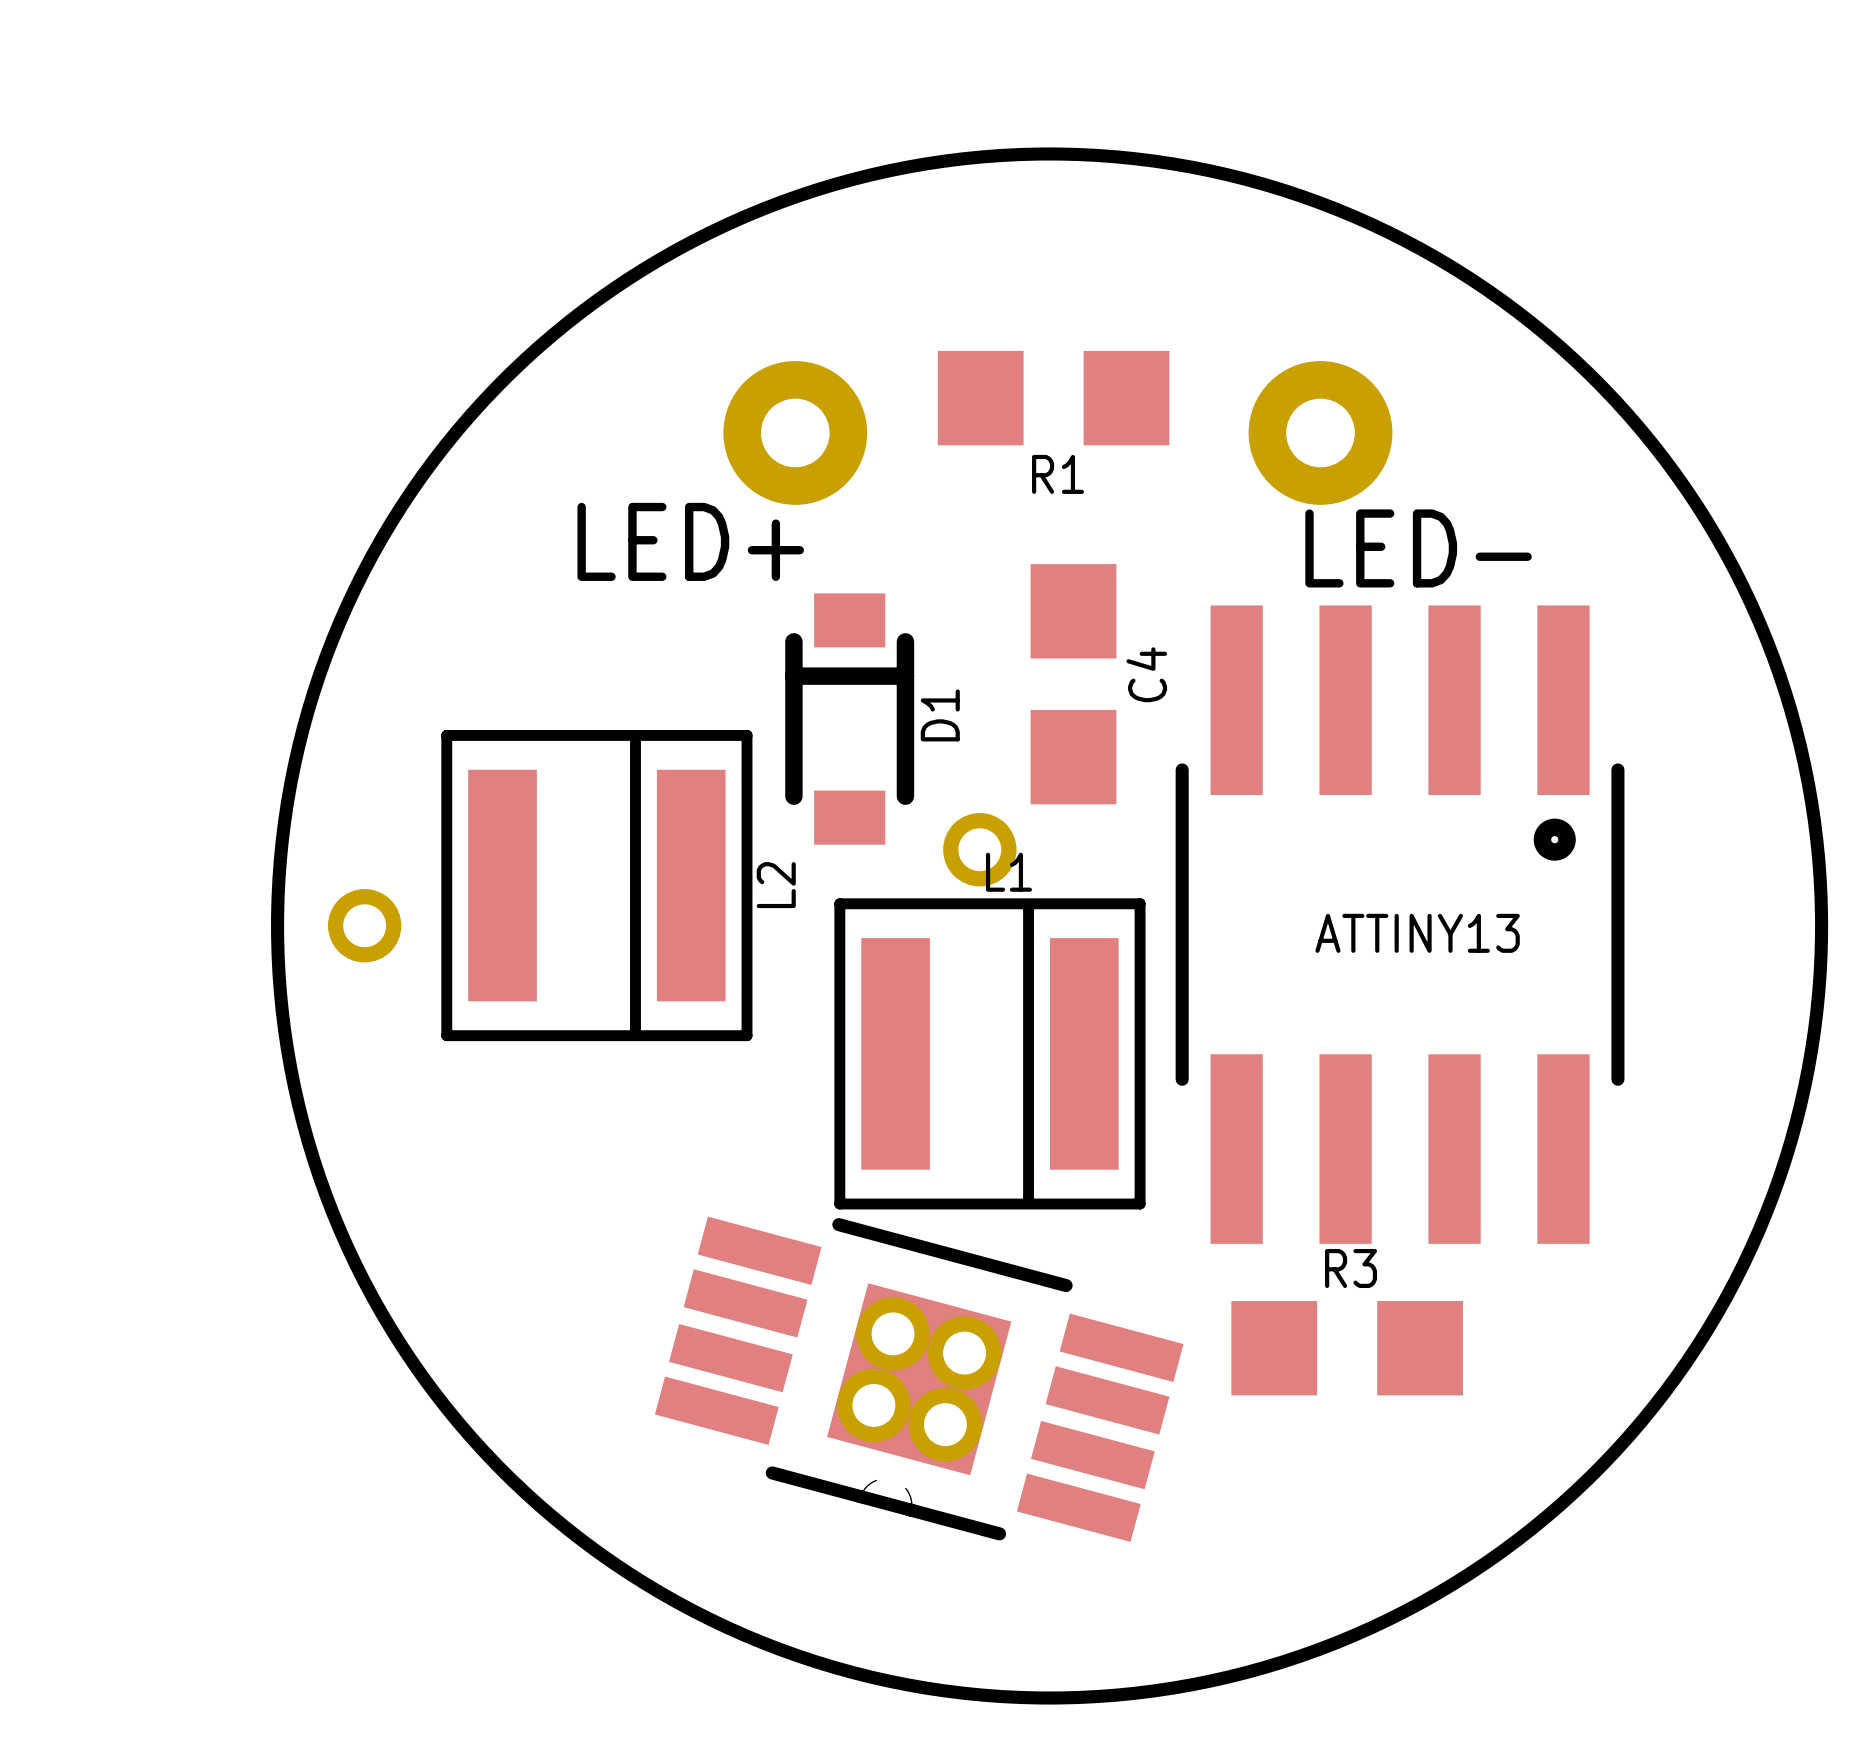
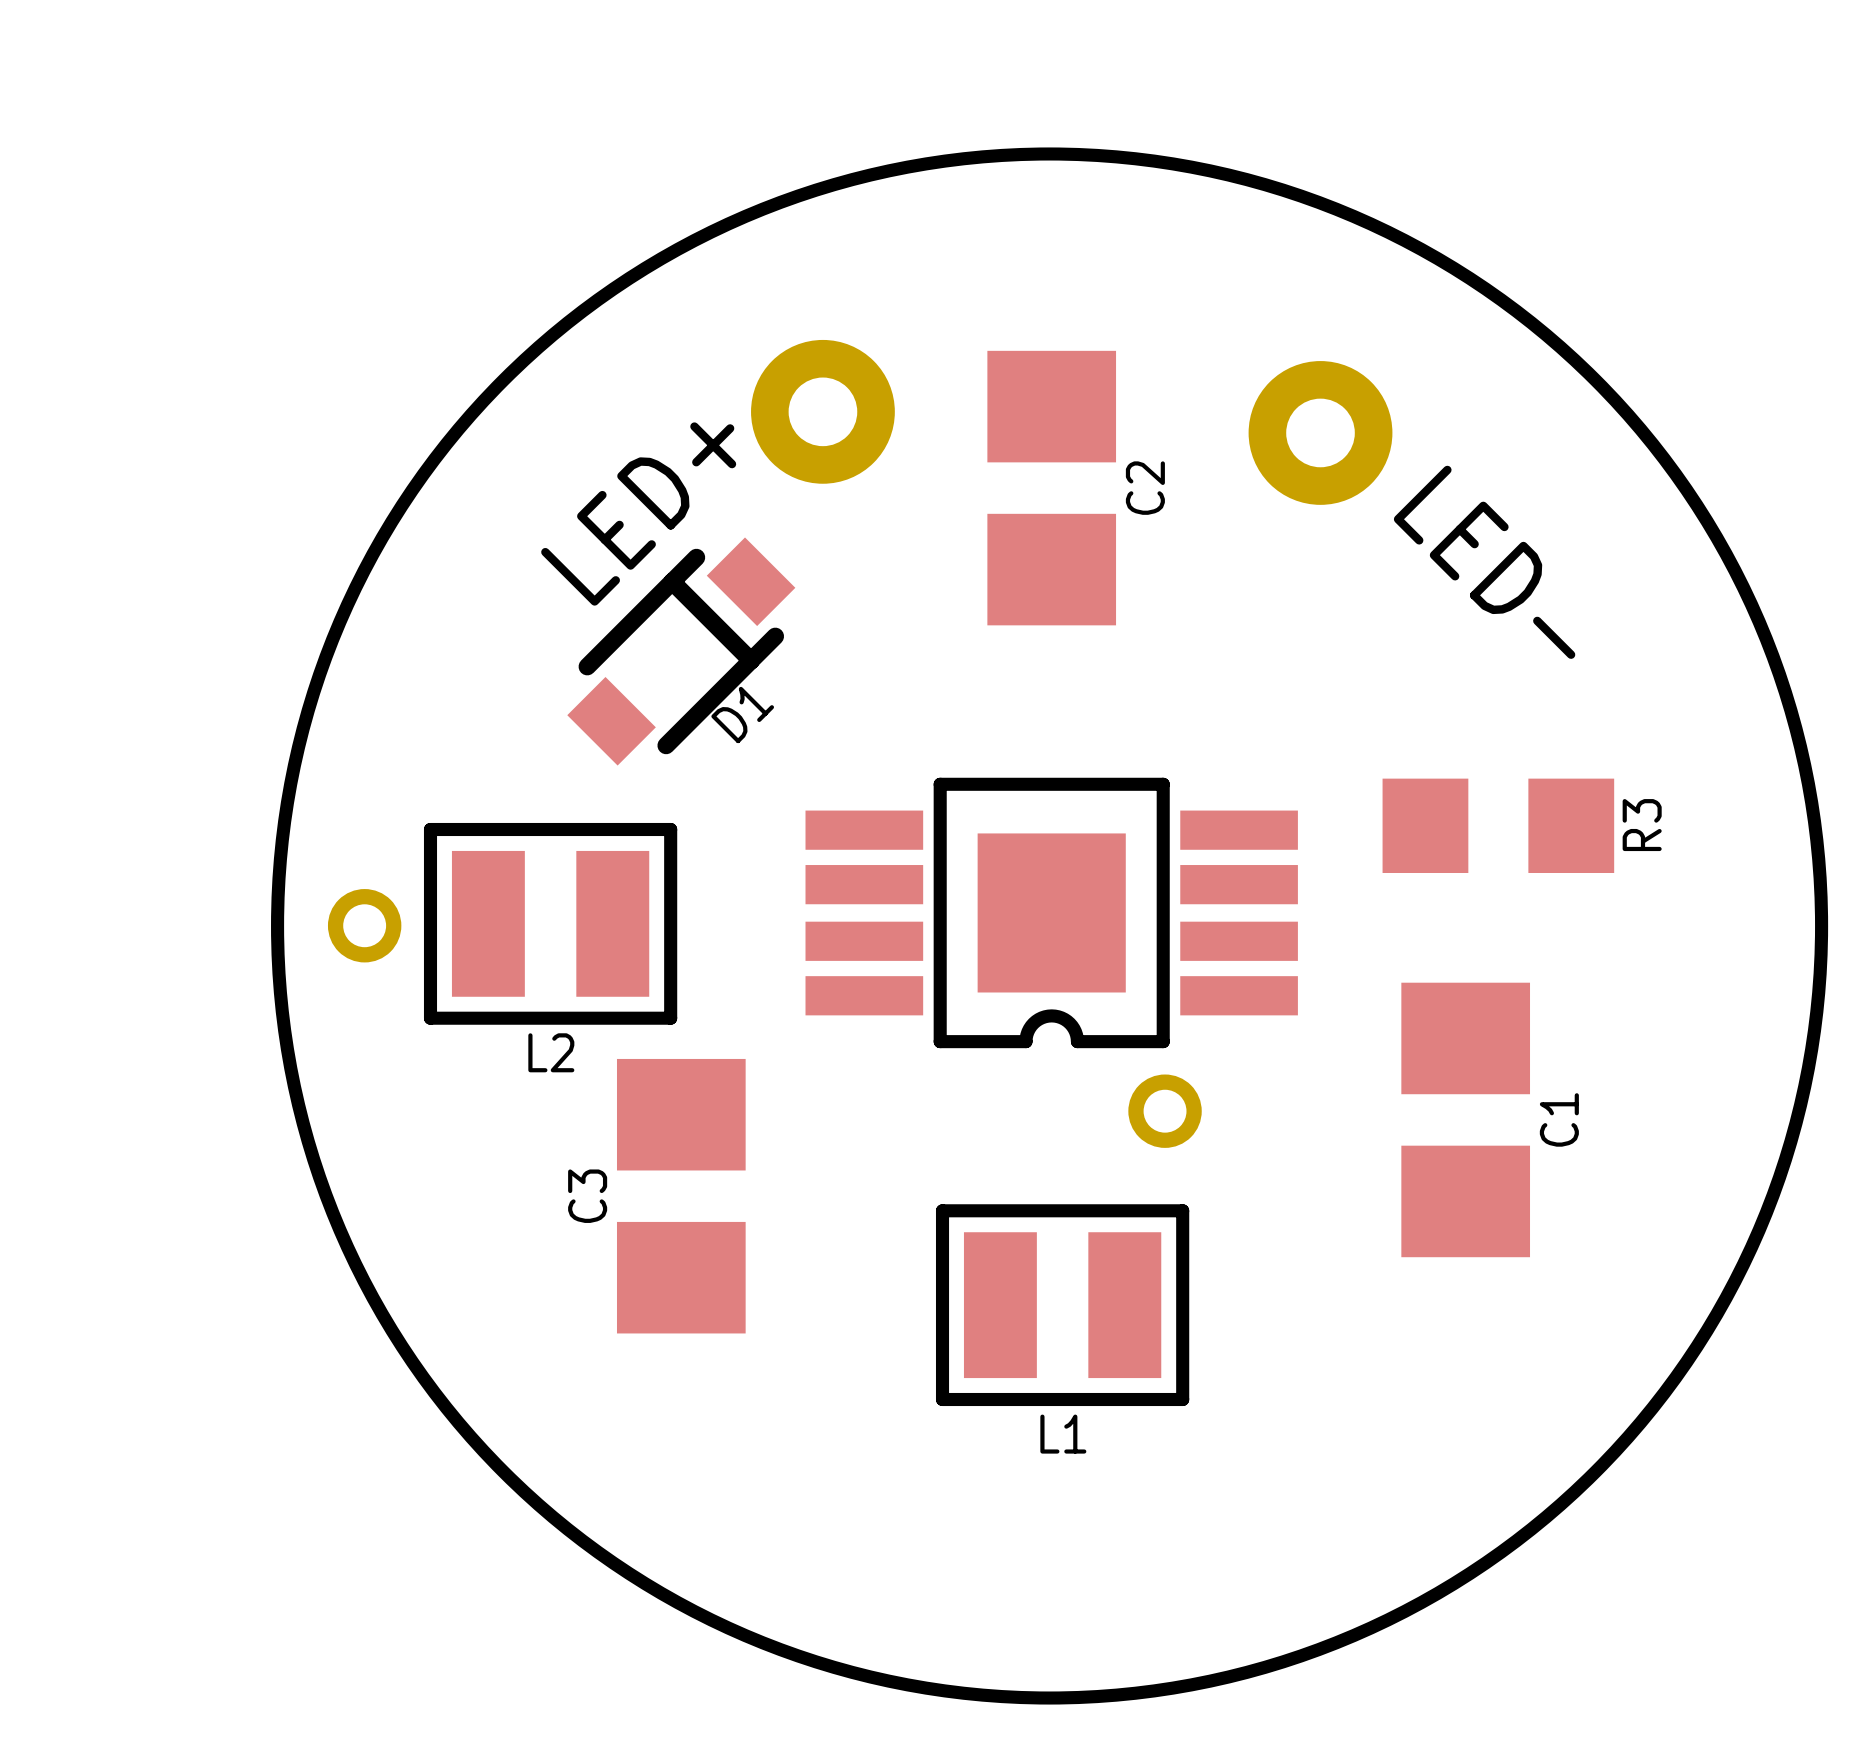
R1: (1053, 398) -> none
LED+ position: (795, 432) -> (822, 411)
C2: none -> (1051, 488)
LED+ name rotation: 0° (690, 541) -> 45° counterclockwise (638, 513)
LED- name rotation: 0° (1418, 548) -> 45° clockwise (1484, 562)
C4: (1073, 684) -> none
D1 rotation: 0° (849, 719) -> 45° clockwise (681, 651)
D1 position: (849, 719) -> (681, 651)
L2 footprint: [441, 730, 753, 1042] -> [423, 822, 678, 1025]
part position: (979, 849) -> (1165, 1111)
L1 name position: L1 (1008, 872) -> L1 (1063, 1434)
L2 name position: L2 (776, 885) -> L2 (551, 1052)
L1 footprint: [834, 898, 1146, 1210] -> [935, 1204, 1190, 1407]
part: none -> (1051, 912)
part: ATTINY13 (1400, 924) -> none
C1: none -> (1465, 1119)
C3: none -> (681, 1196)
R3 name rotation: 0° (1351, 1268) -> 90° counterclockwise (1642, 825)
R3 name position: R3 (1351, 1268) -> R3 (1642, 825)
R3 position: (1347, 1348) -> (1498, 825)
part: (919, 1379) -> none

